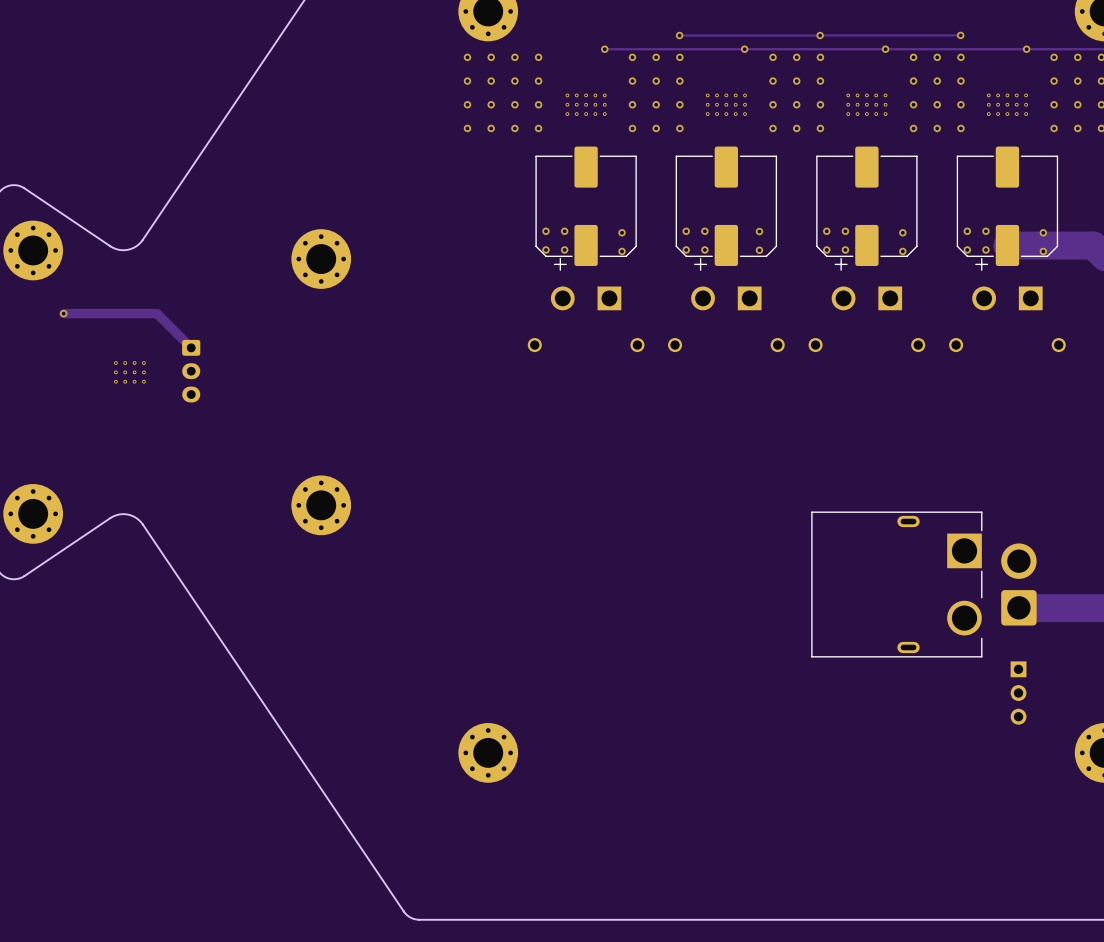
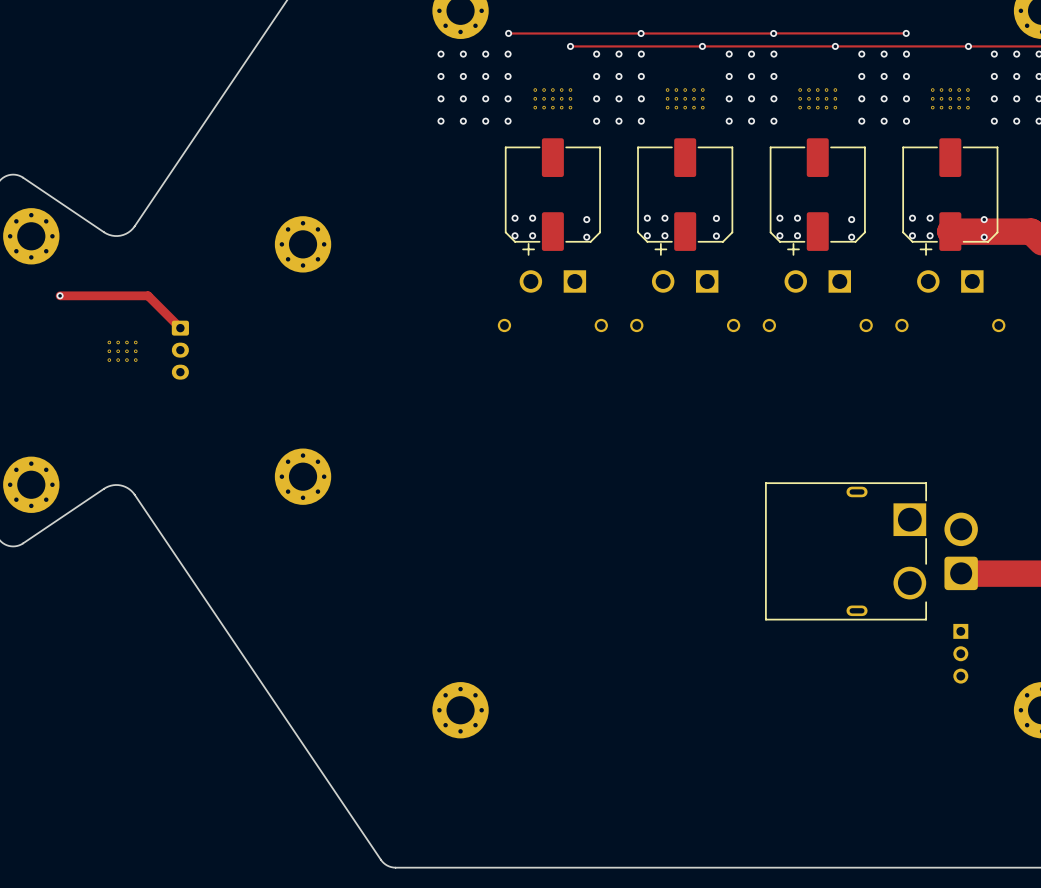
track: none -> (508, 33) (641, 33)
via: none -> (508, 33)

